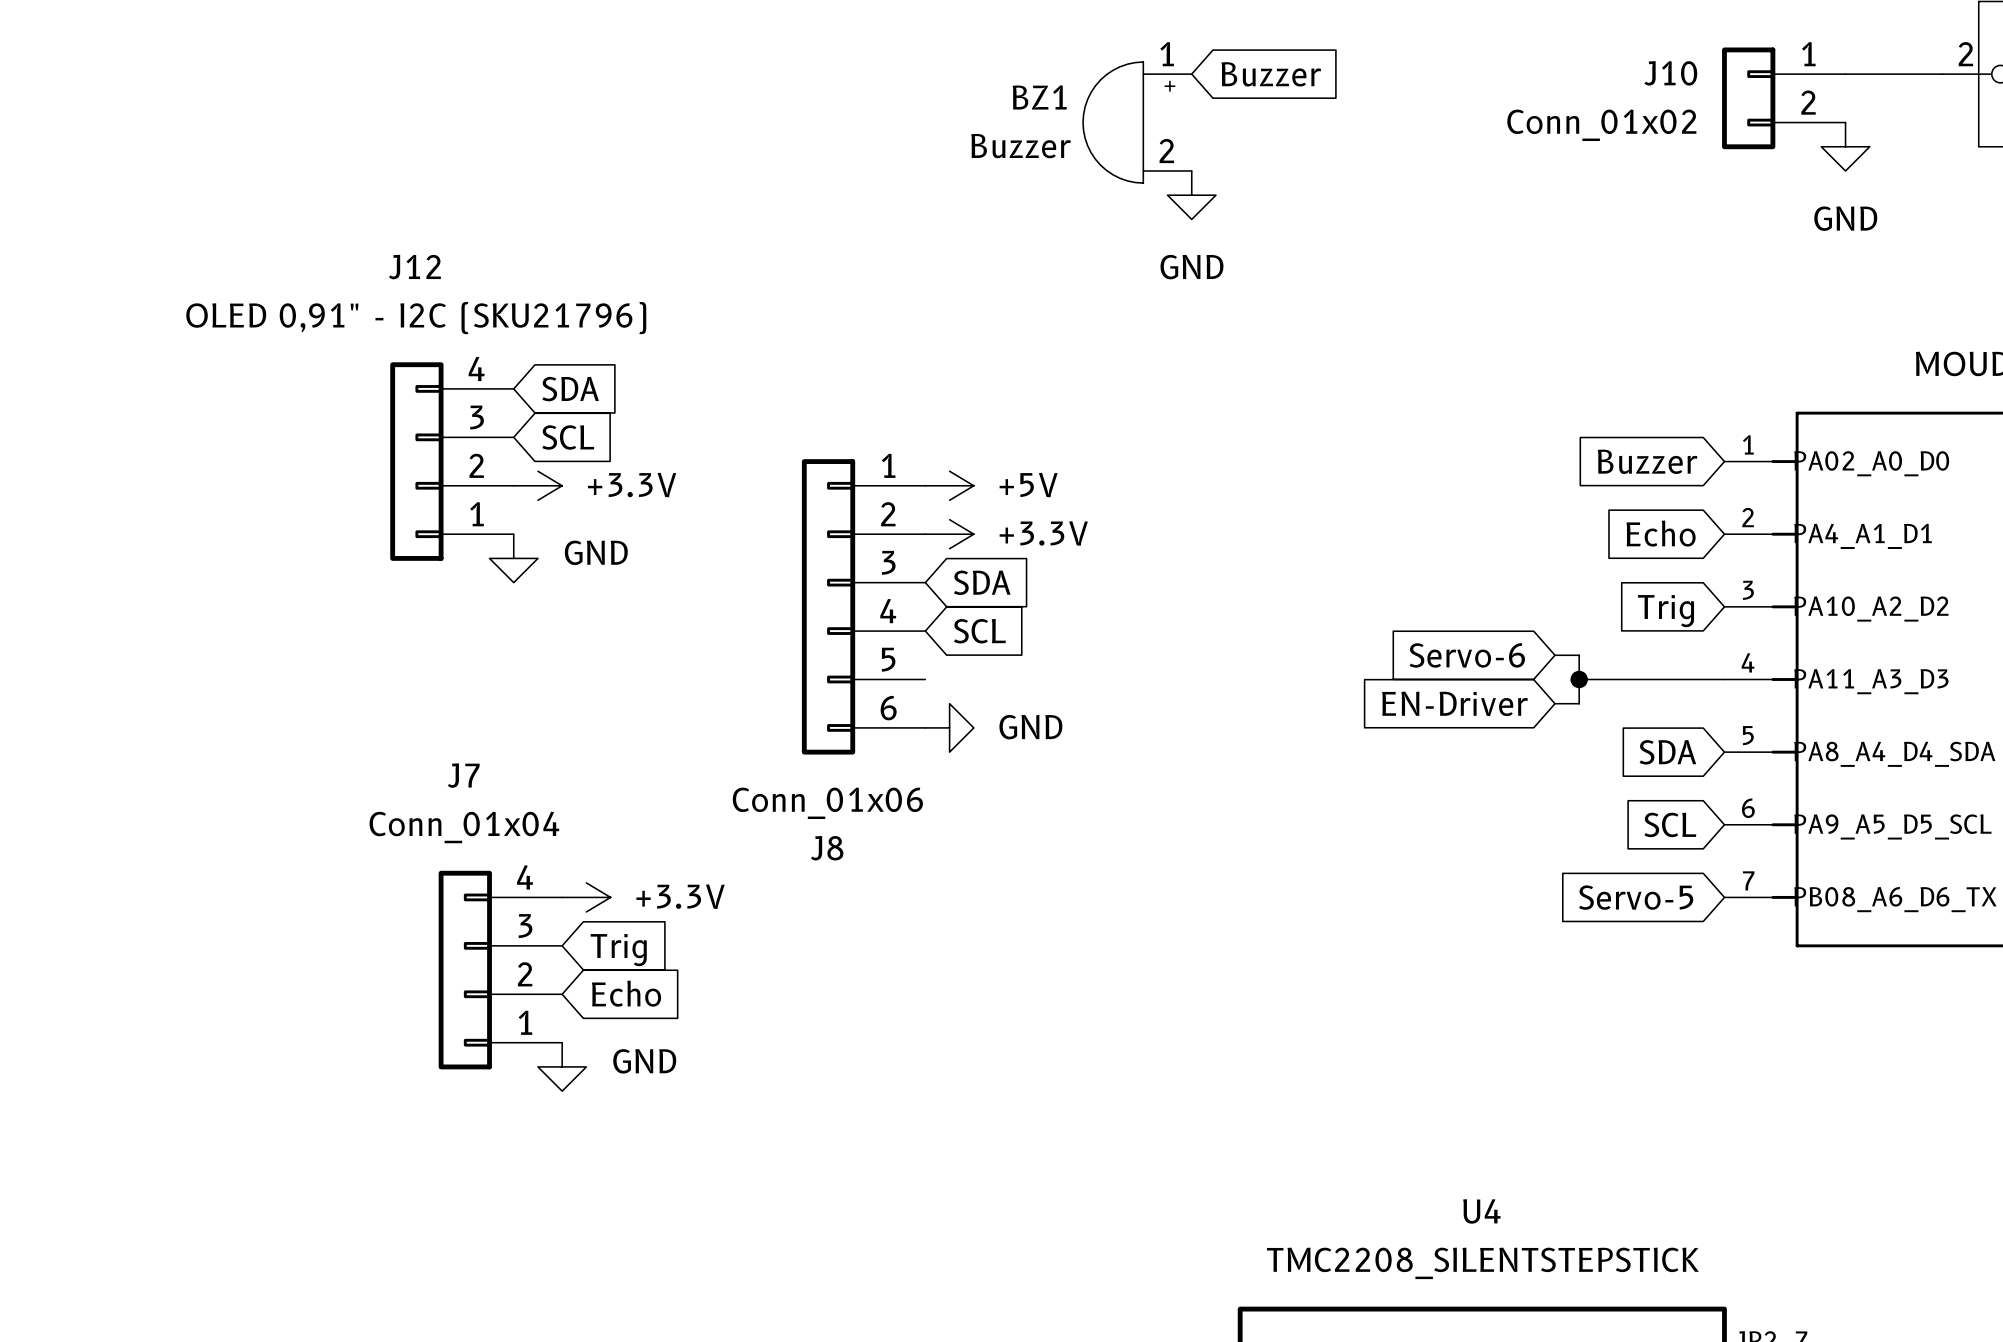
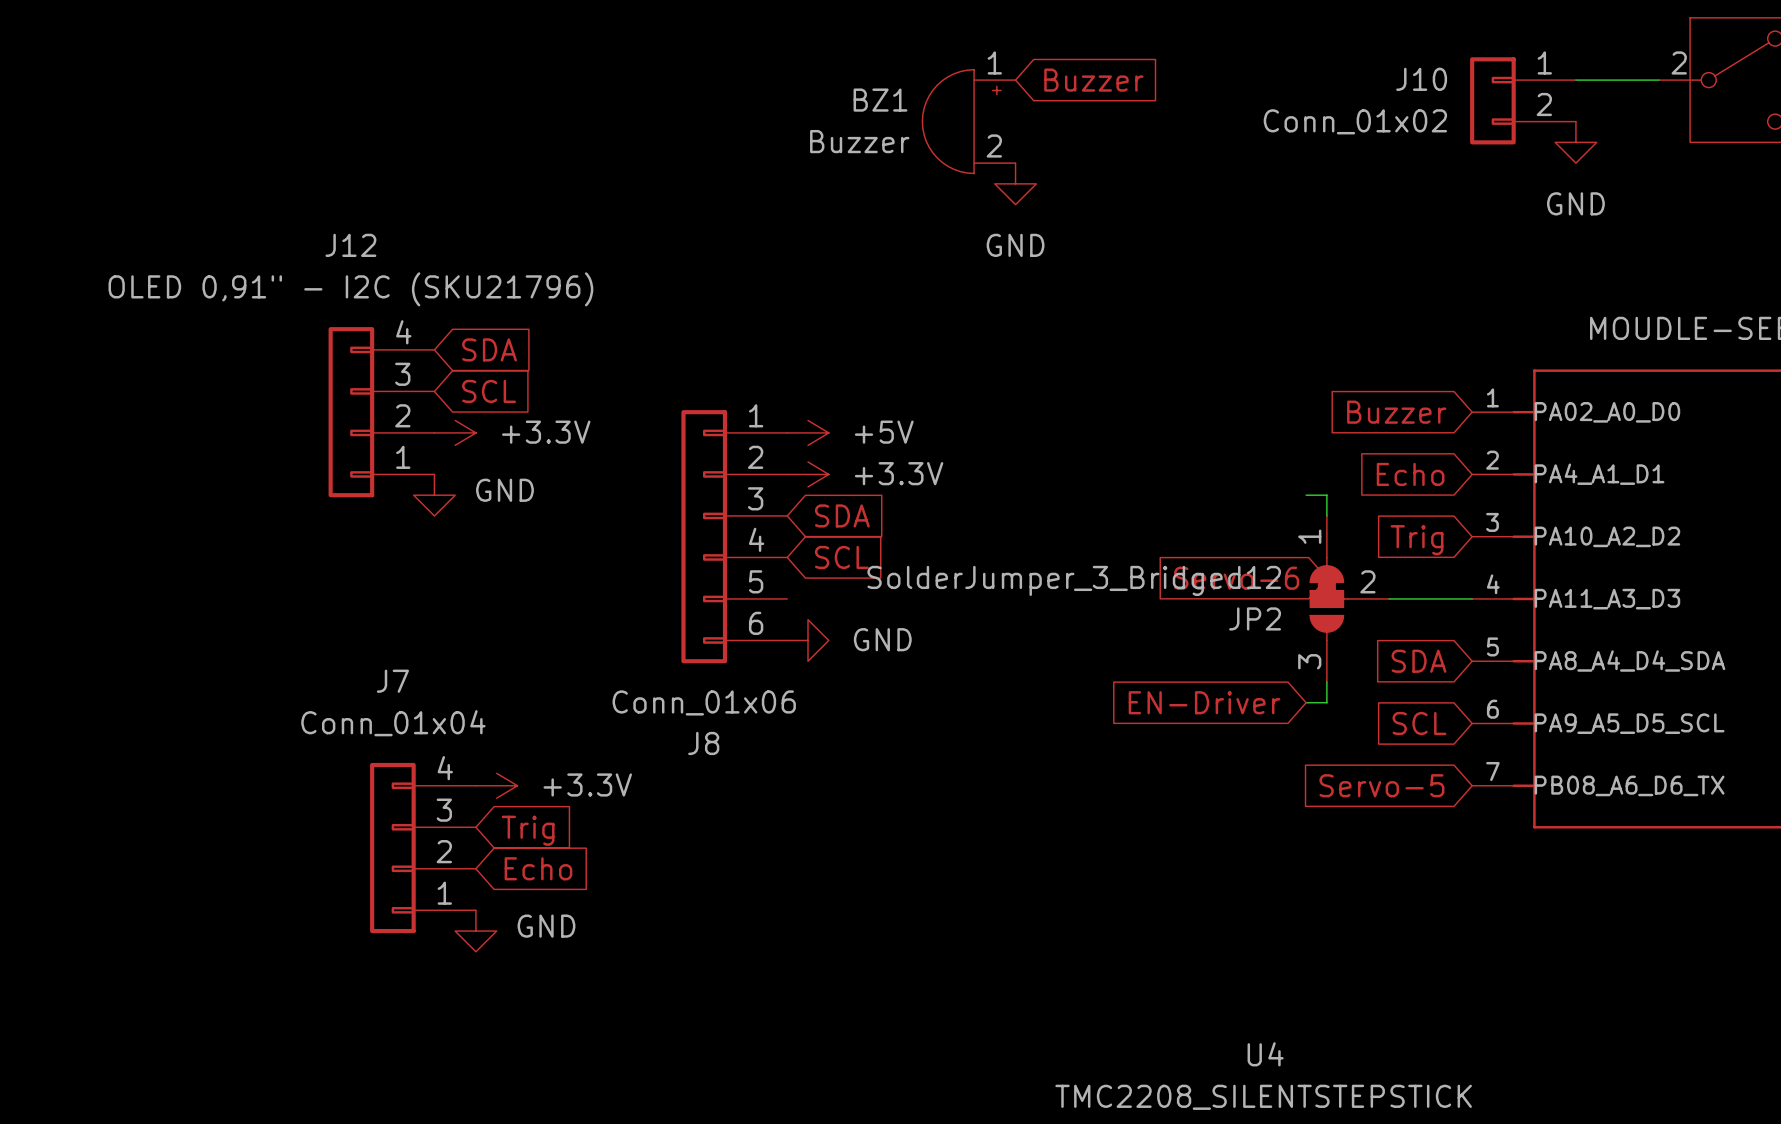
wire: none -> (1306, 495) (1326, 495) (1326, 515)
wire: (1554, 655) (1579, 655) (1579, 703) (1554, 703) -> none
junction: (1579, 679) -> none
JP2: none -> SolderJumper_3_Bridged12 (1349, 598)
global label position: EN-Driver (1454, 703) -> EN-Driver (1204, 702)
wire: none -> (1326, 681) (1326, 702) (1306, 702)

